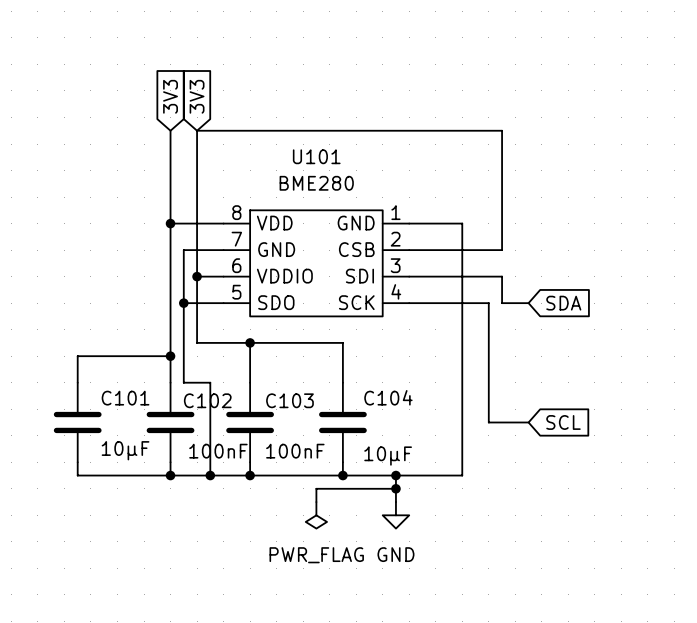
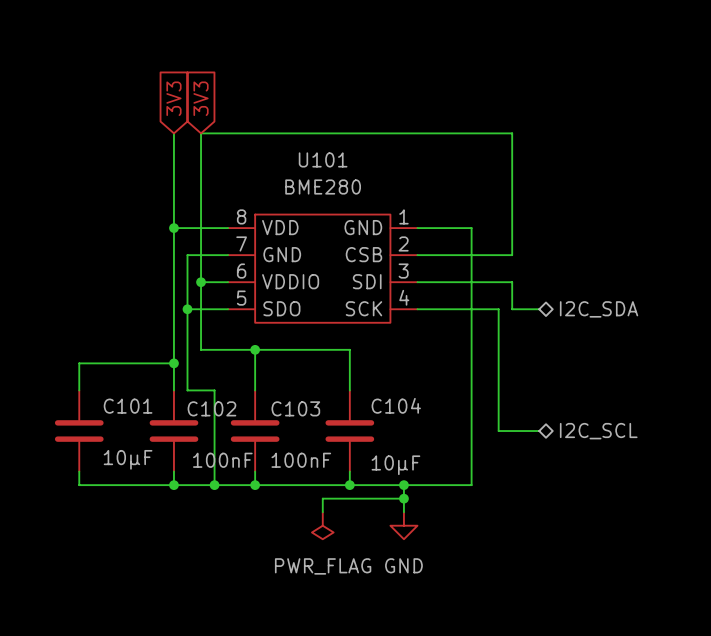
global label: SDA (563, 303) -> none
hierarchical label: none -> I2C_SDA (599, 309)
global label: SCL (563, 422) -> none
hierarchical label: none -> I2C_SCL (598, 431)

